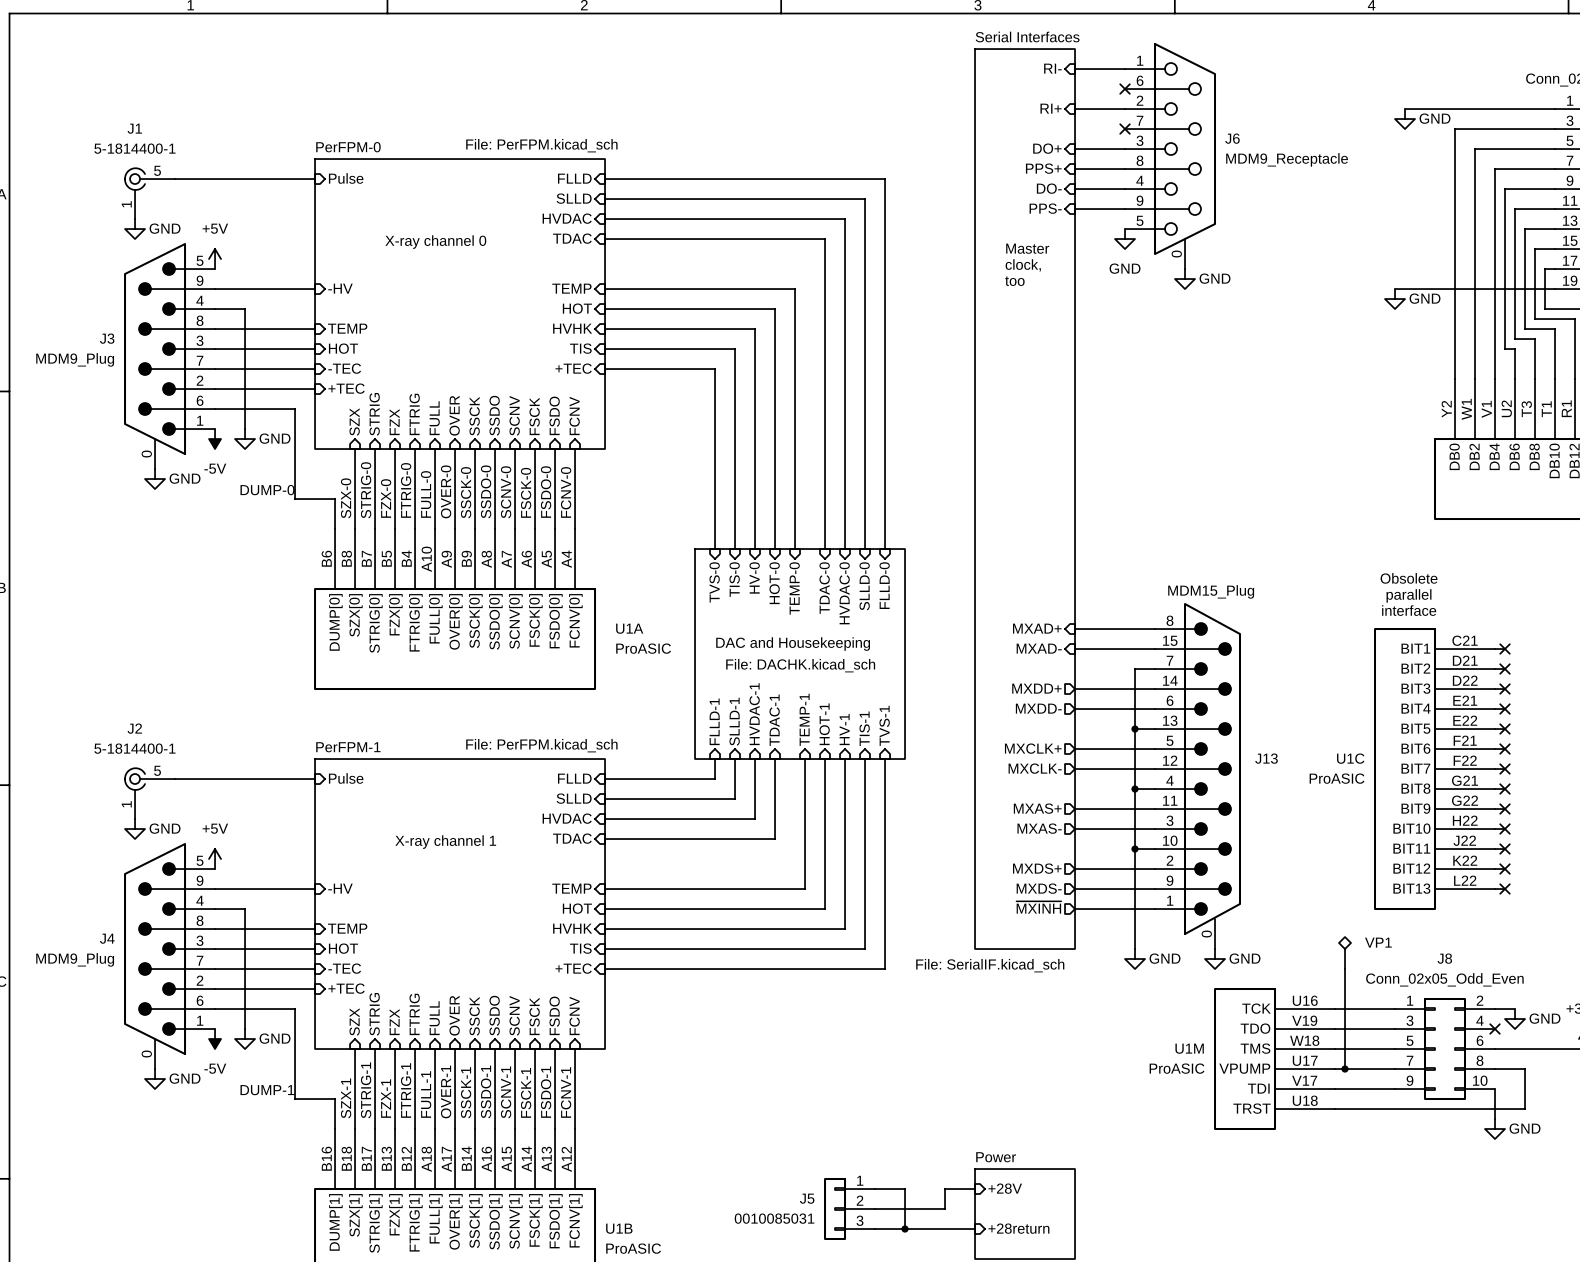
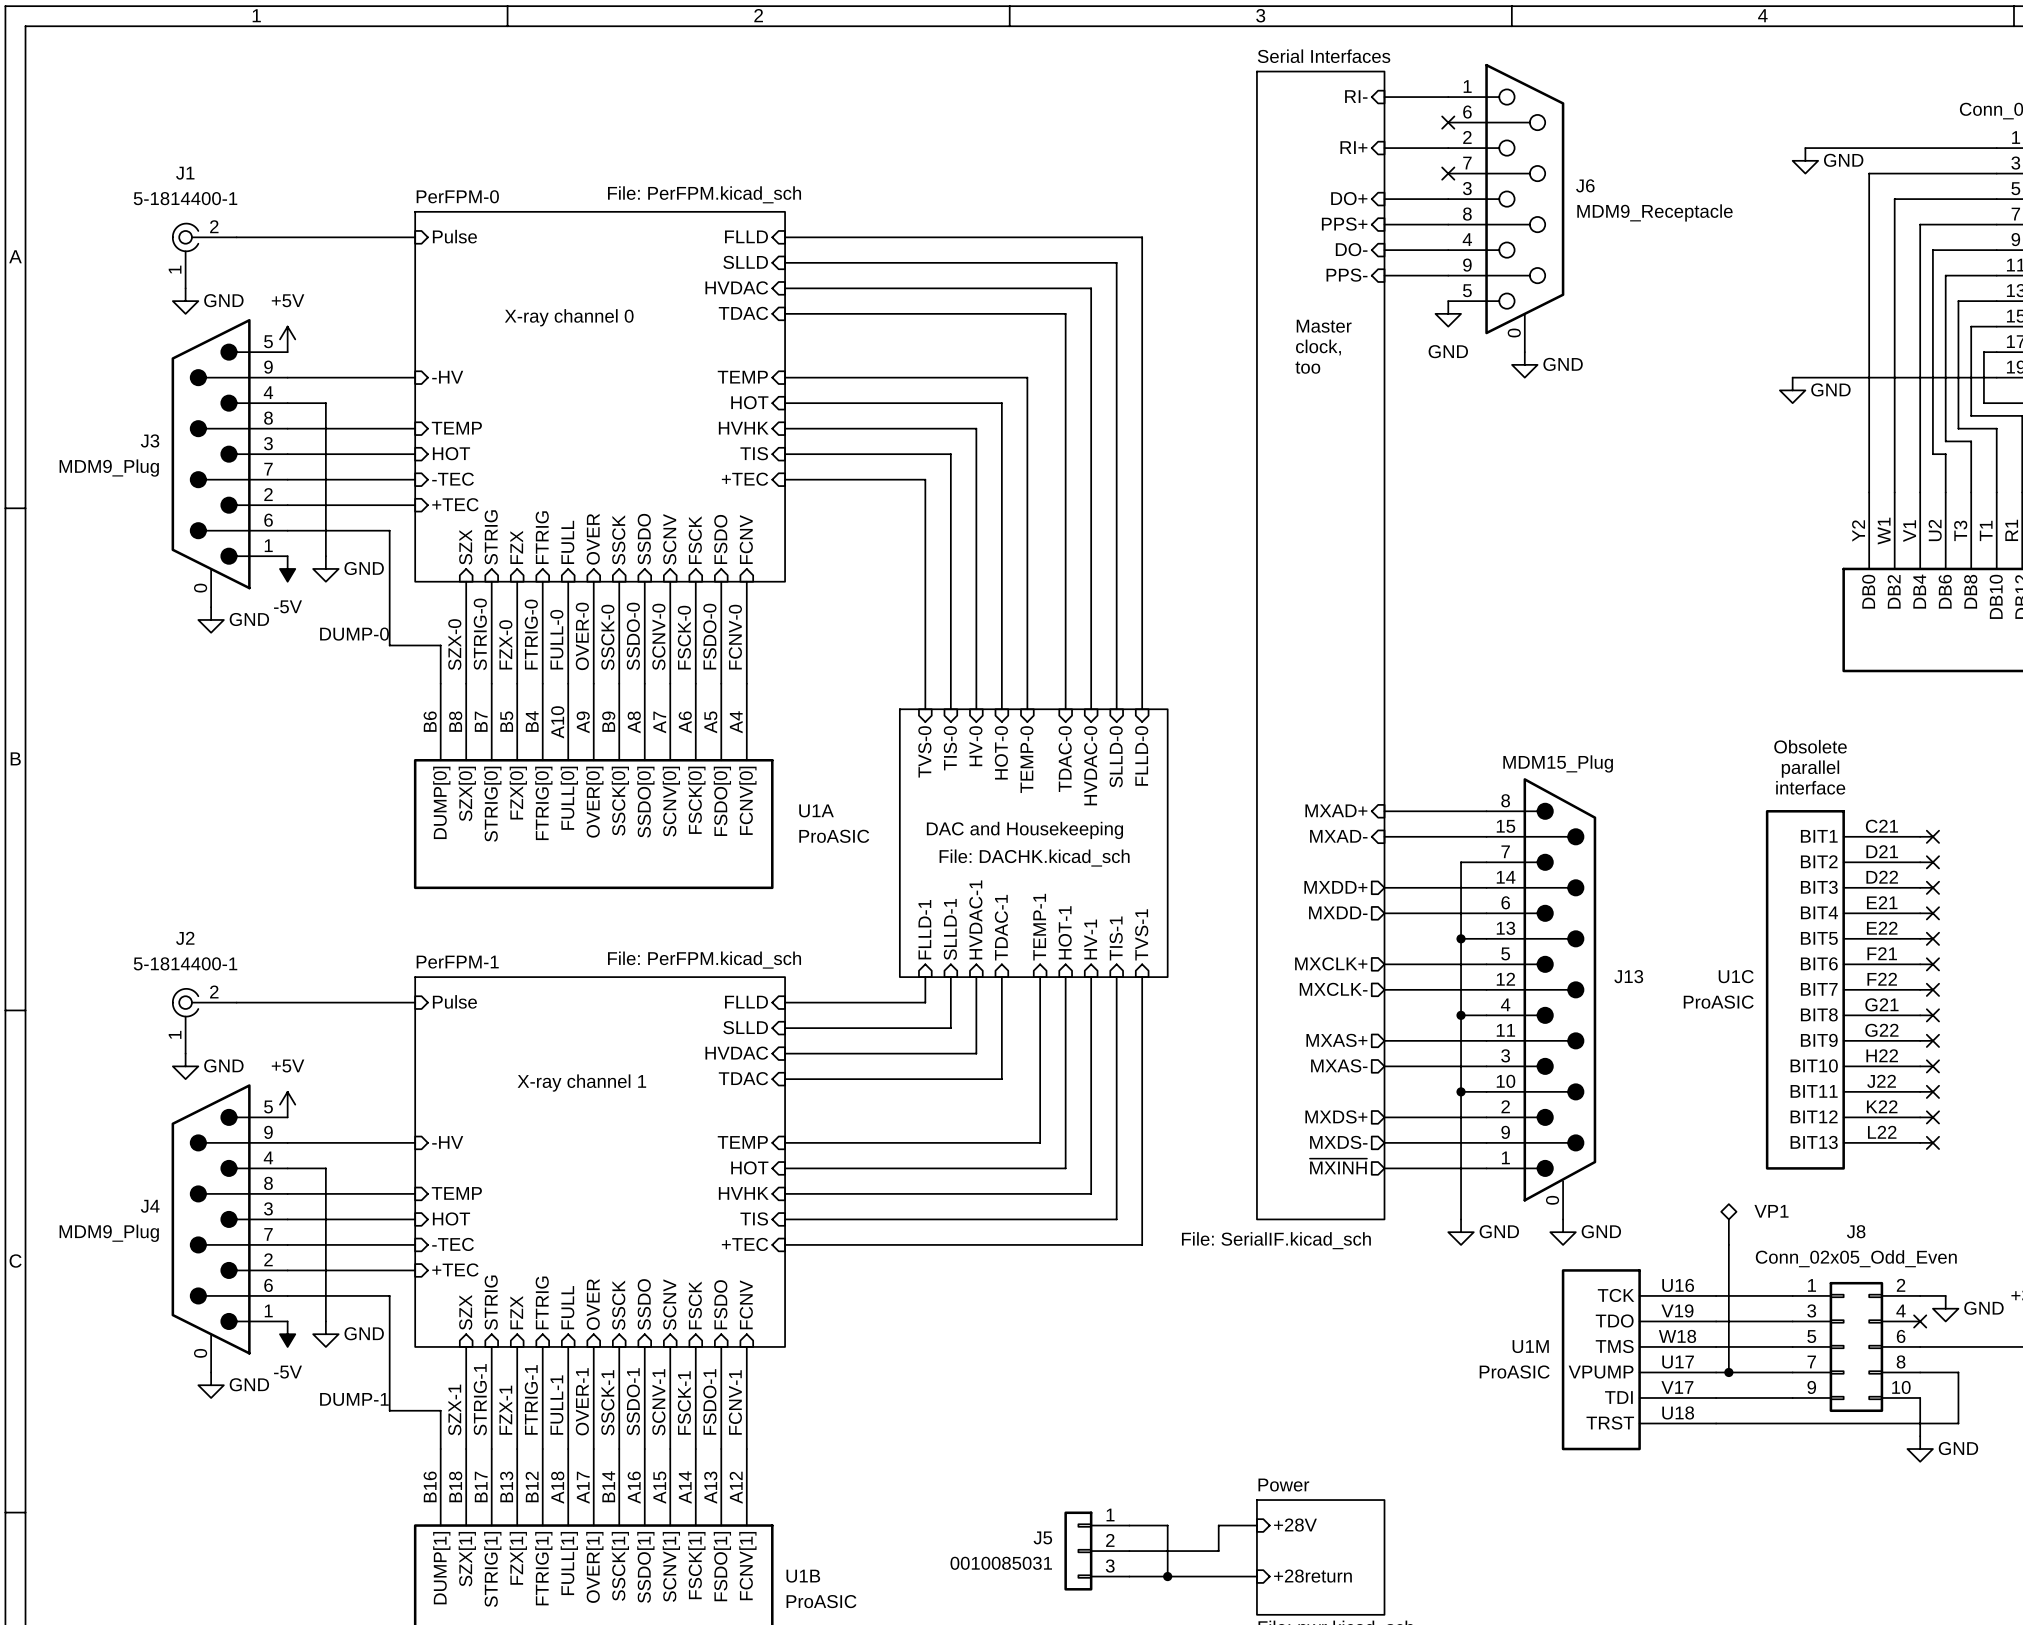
J1 pin number: 5 (157, 170) -> 2 (214, 226)
J2 pin number: 5 (157, 770) -> 2 (214, 991)

